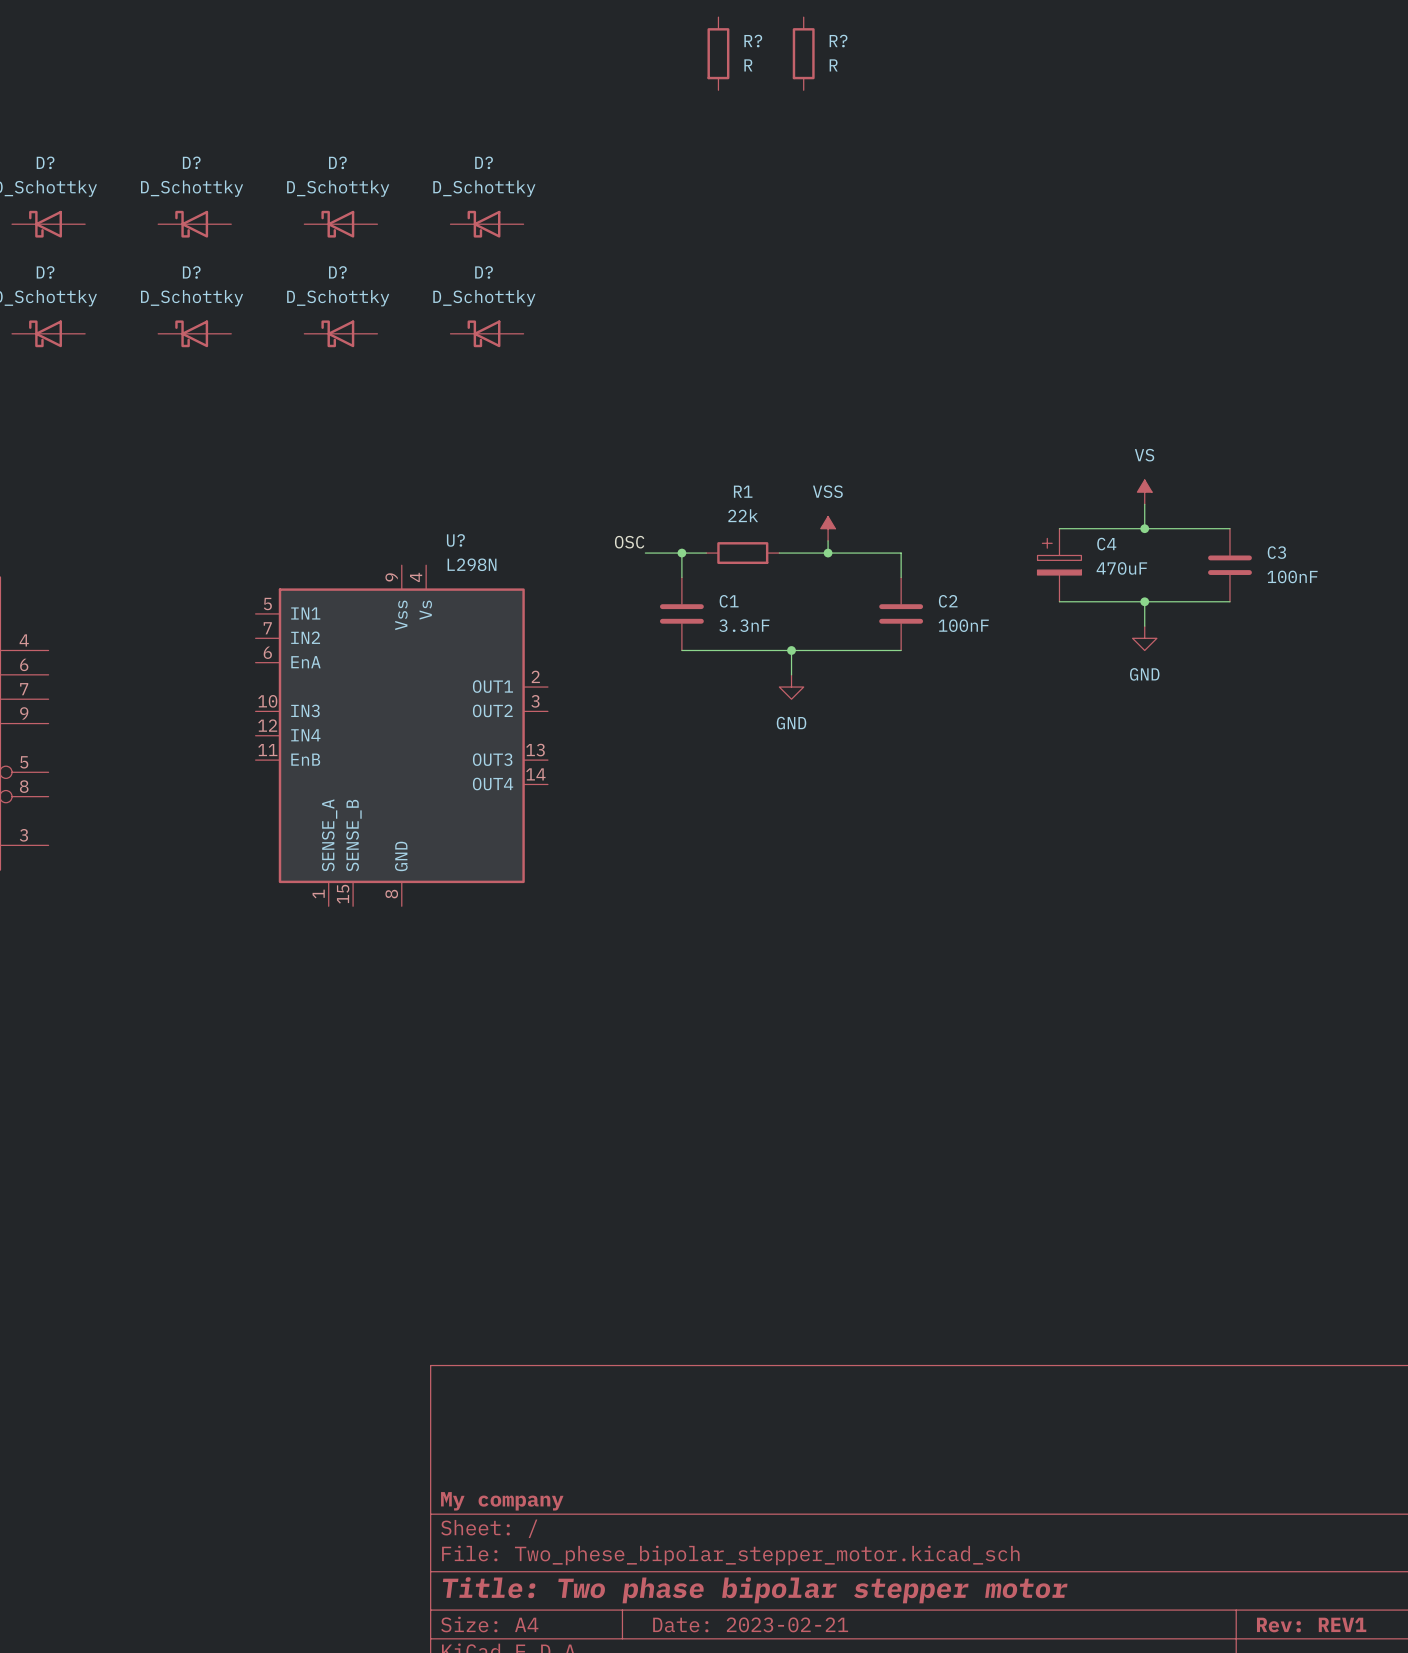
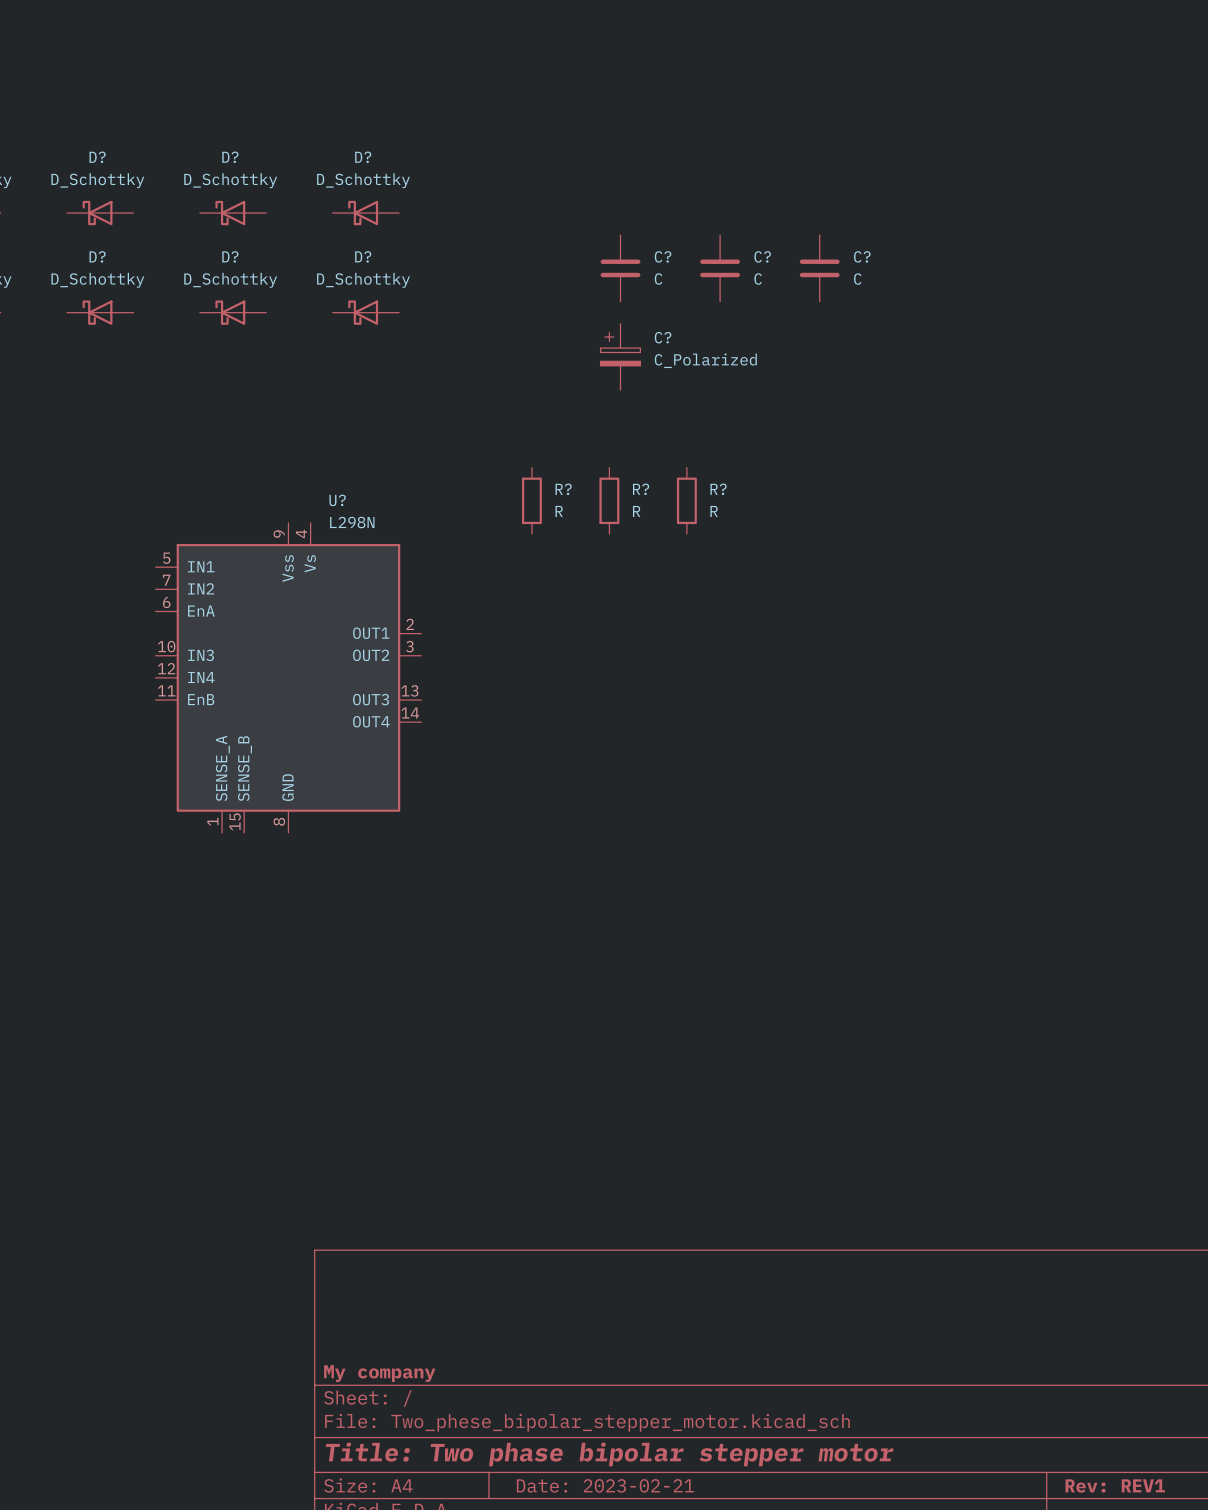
R?: R (718, 53) -> none
R?: R (803, 53) -> none
C?: none -> C (620, 268)
C?: none -> C (720, 268)
C?: none -> C (819, 268)
C?: none -> C_Polarized (620, 356)
power symbol: VS (1144, 492) -> none
wire: (1144, 504) (1144, 528) -> none
power symbol: VSS (828, 528) -> none
wire: (1059, 528) (1229, 528) -> none
junction: (1144, 528) -> none
R?: none -> R (531, 500)
R?: none -> R (609, 500)
wire: (828, 540) (828, 553) -> none
R?: none -> R (686, 500)
label: OSC (629, 542) -> none
wire: (645, 553) (706, 553) -> none
wire: (681, 553) (681, 577) -> none
junction: (681, 553) -> none
R1: 22k (742, 553) -> none
wire: (779, 553) (901, 553) (901, 577) -> none
junction: (828, 553) -> none
C4: 470uF (1059, 565) -> none
C3: 100nF (1229, 565) -> none
wire: (1059, 601) (1229, 601) -> none
wire: (1144, 601) (1144, 626) -> none
junction: (1144, 601) -> none
C1: 3.3nF (681, 613) -> none
C2: 100nF (901, 613) -> none
power symbol: GND (1144, 638) -> none
wire: (681, 650) (901, 650) -> none
wire: (791, 650) (791, 674) -> none
junction: (791, 650) -> none
power symbol: GND (791, 687) -> none

